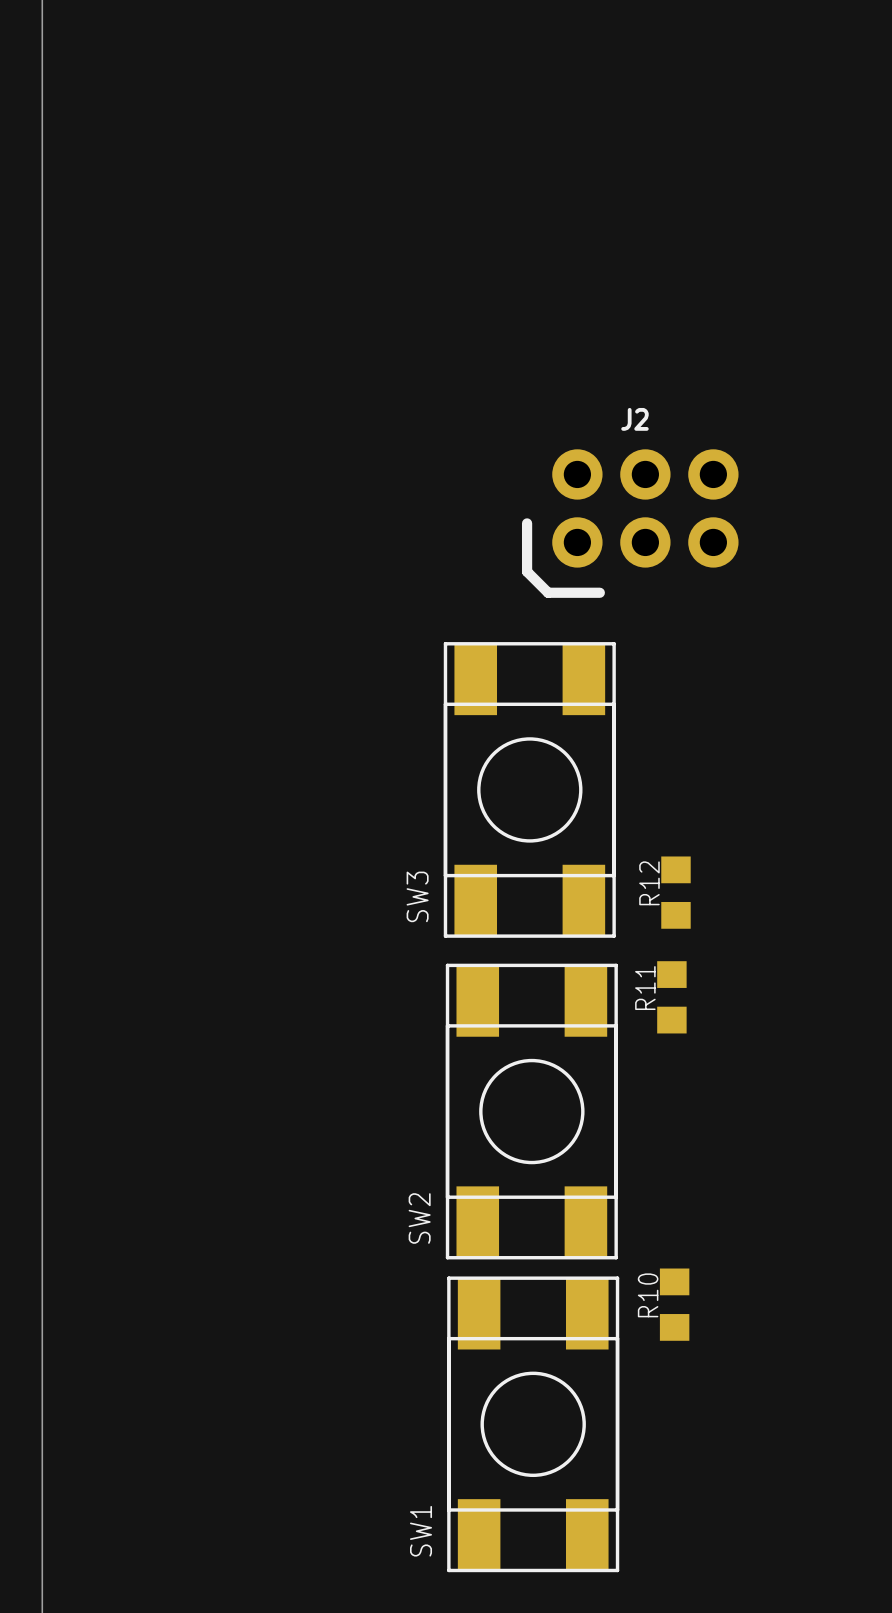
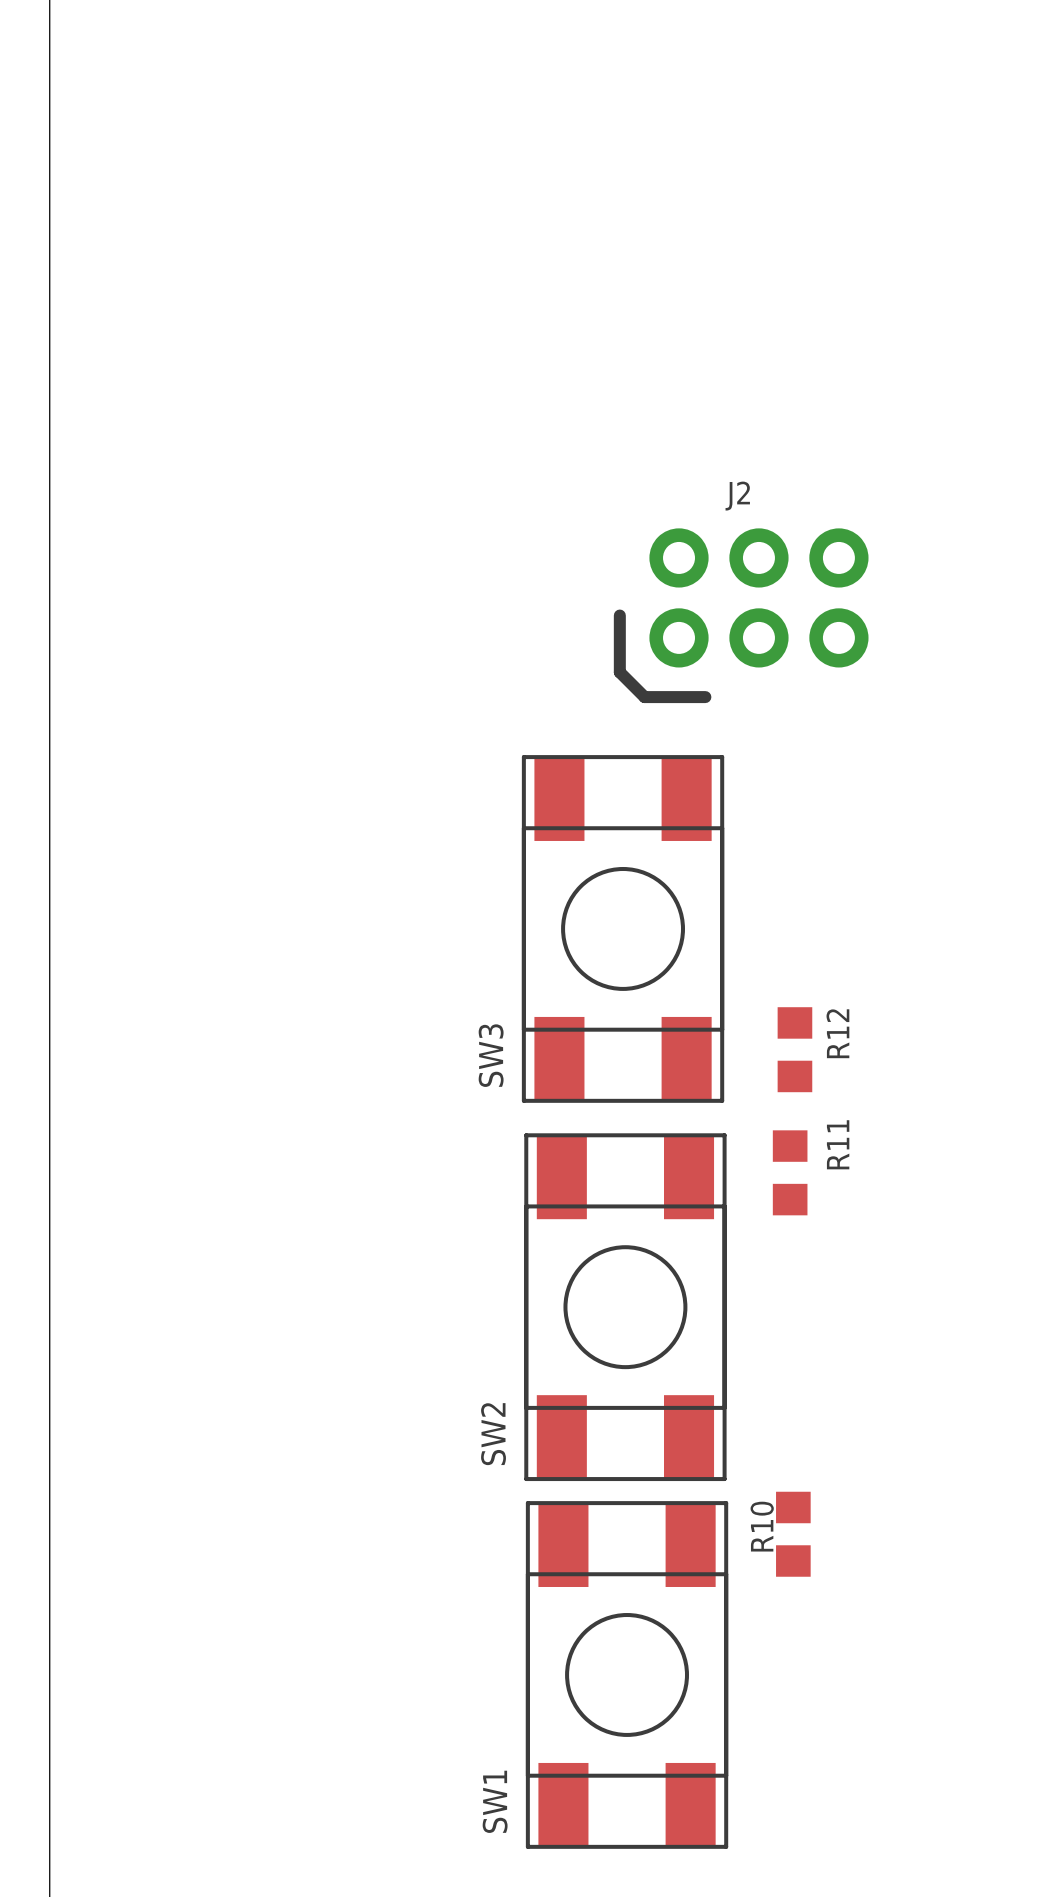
R12 name position: R12 (649, 883) -> R12 (837, 1033)
R11 name position: R11 (645, 988) -> R11 (838, 1144)

